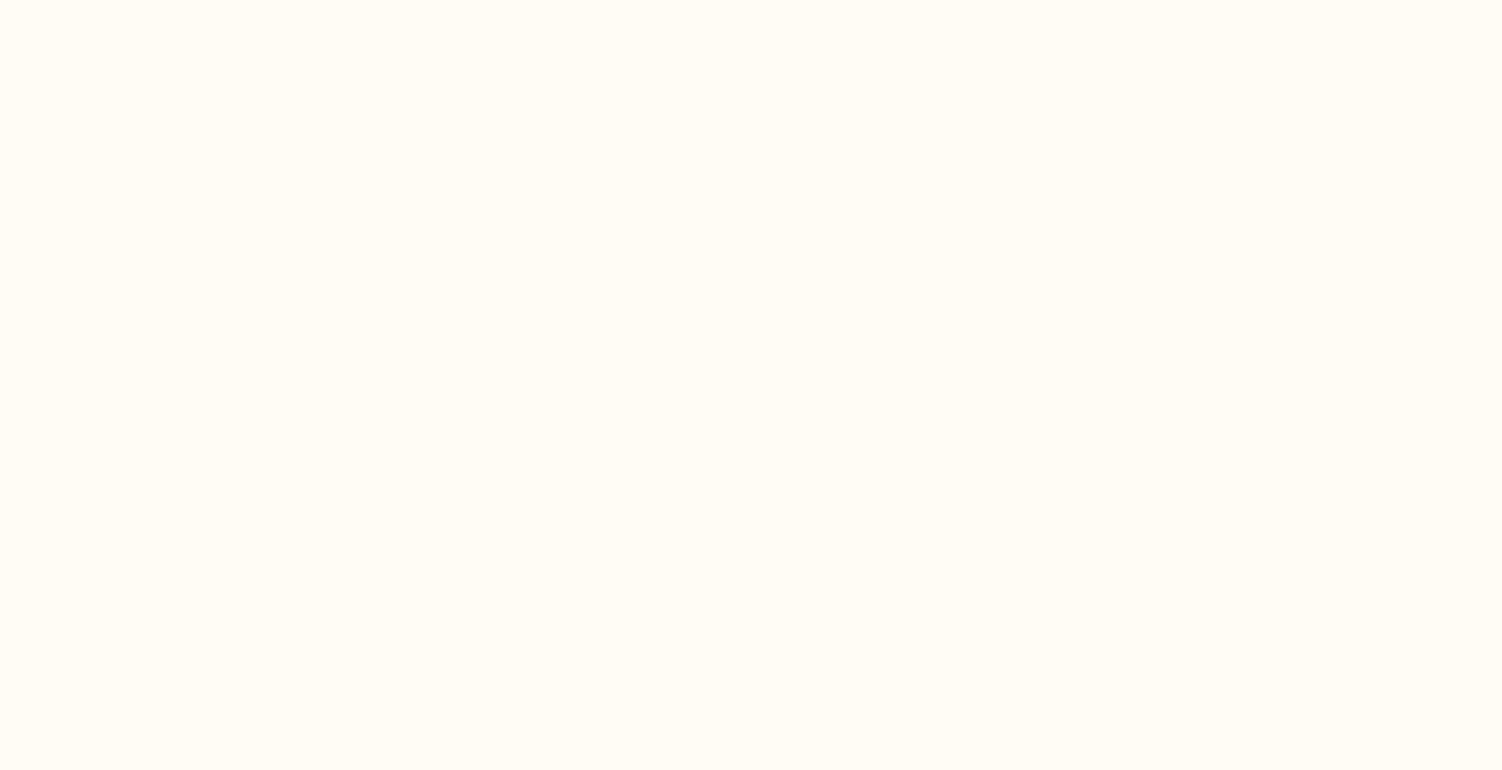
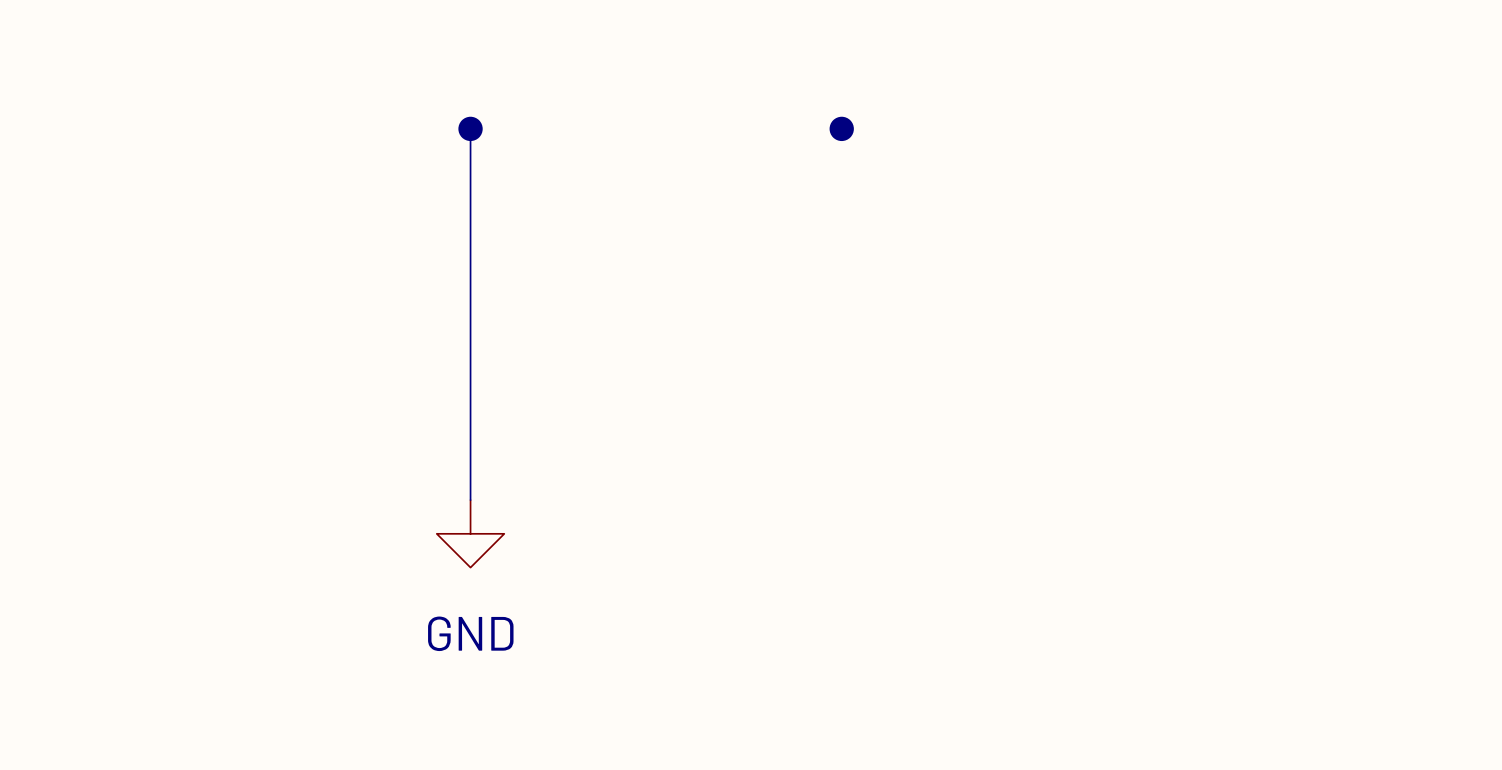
wire: none -> (470, 128) (470, 500)
junction: none -> (470, 128)
junction: none -> (841, 128)
power symbol: none -> GND (470, 533)

